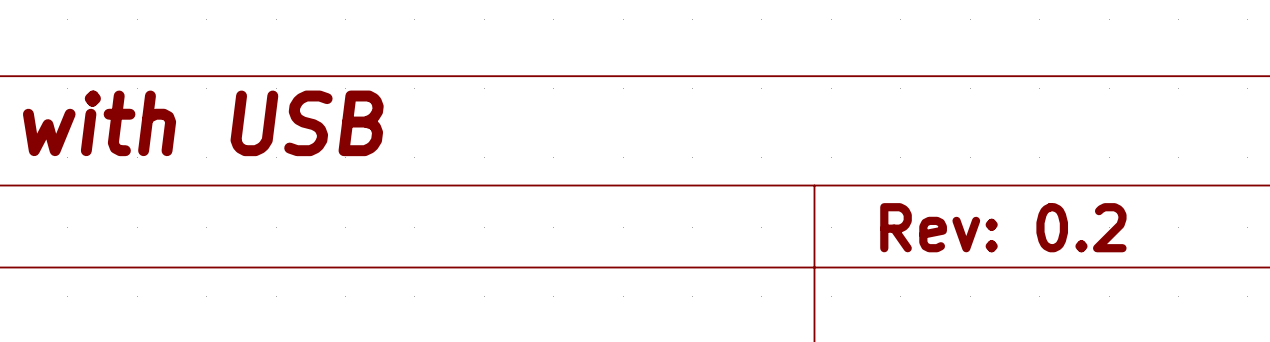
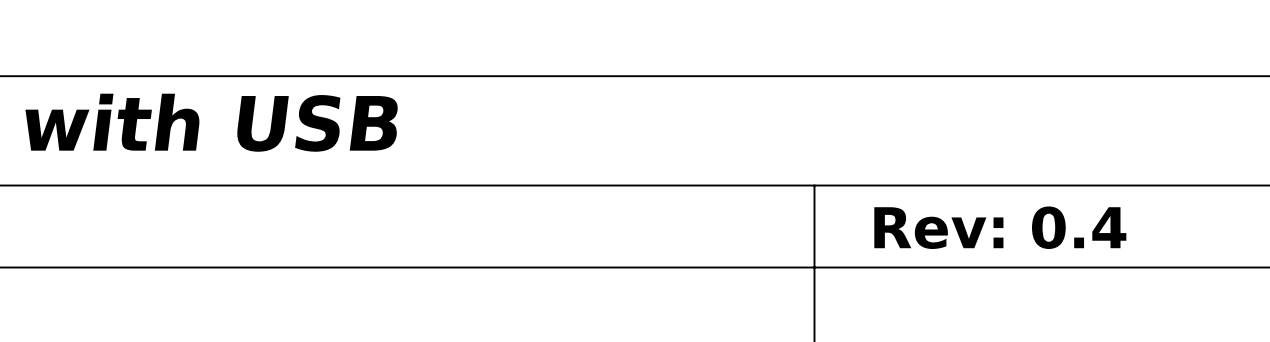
title block: Rev: 0.2 (1003, 227) -> Rev: 0.4 (1000, 227)

